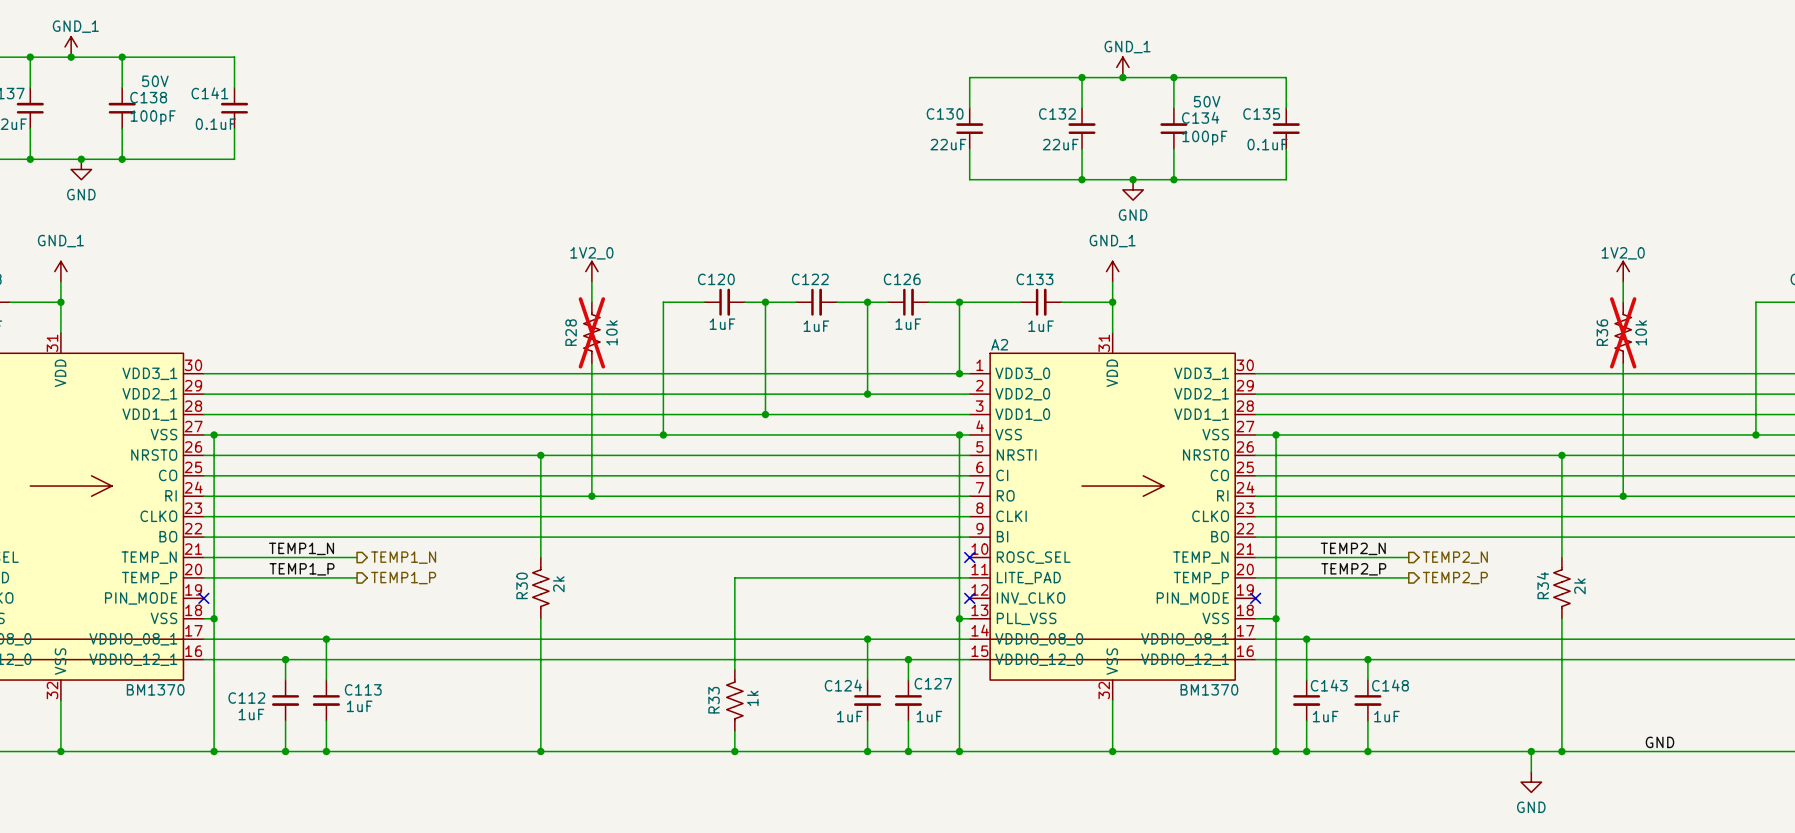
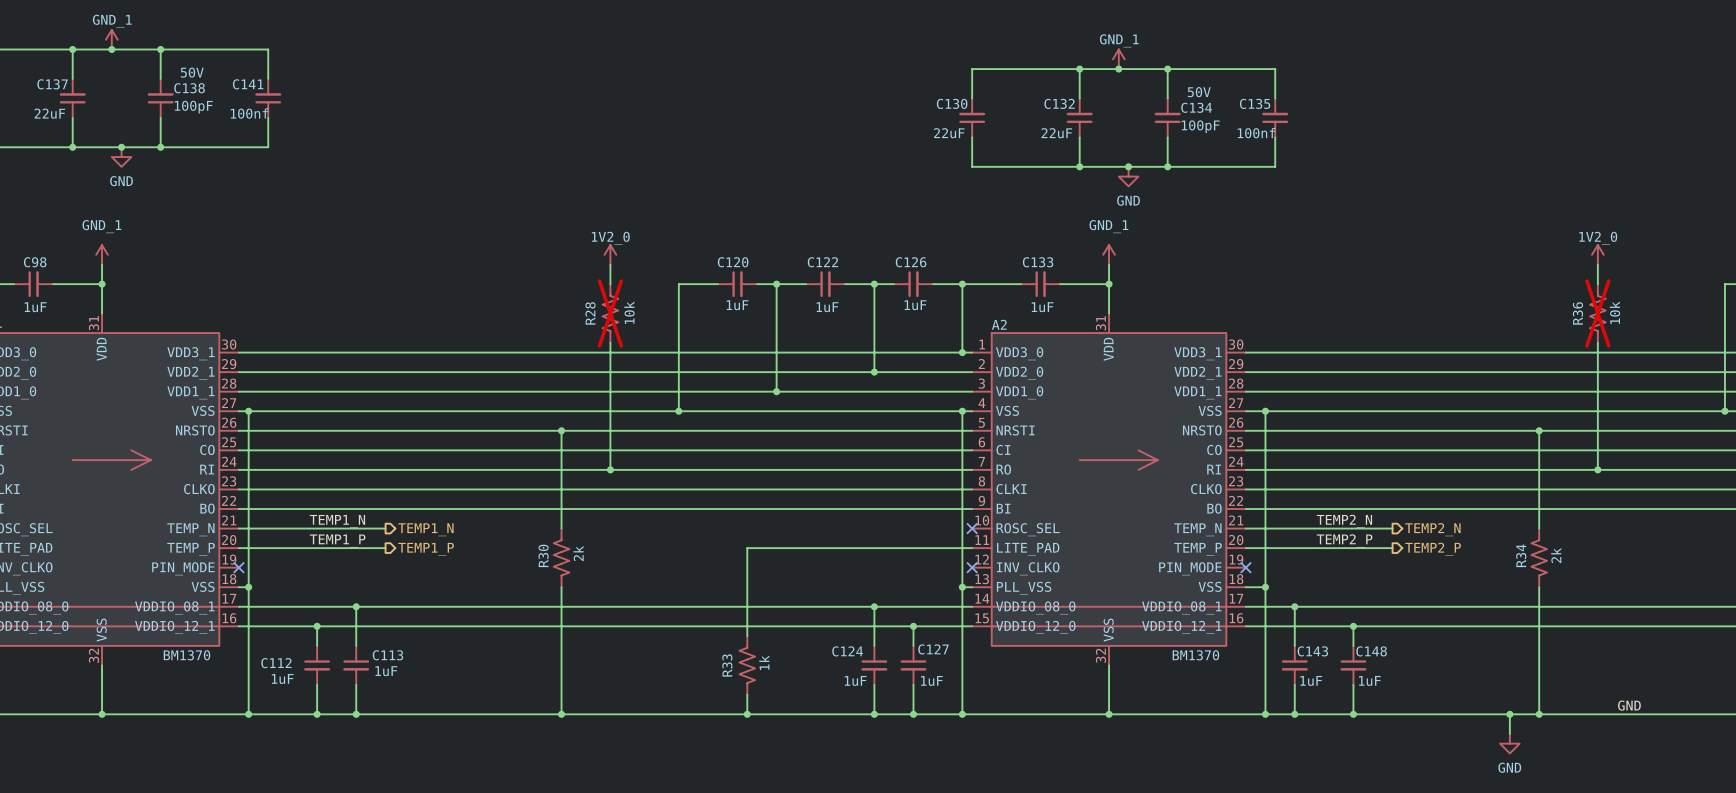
C141 value: 0.1uF (215, 124) -> 100nf (249, 113)
C135 value: 0.1uF (1267, 144) -> 100nf (1256, 133)

